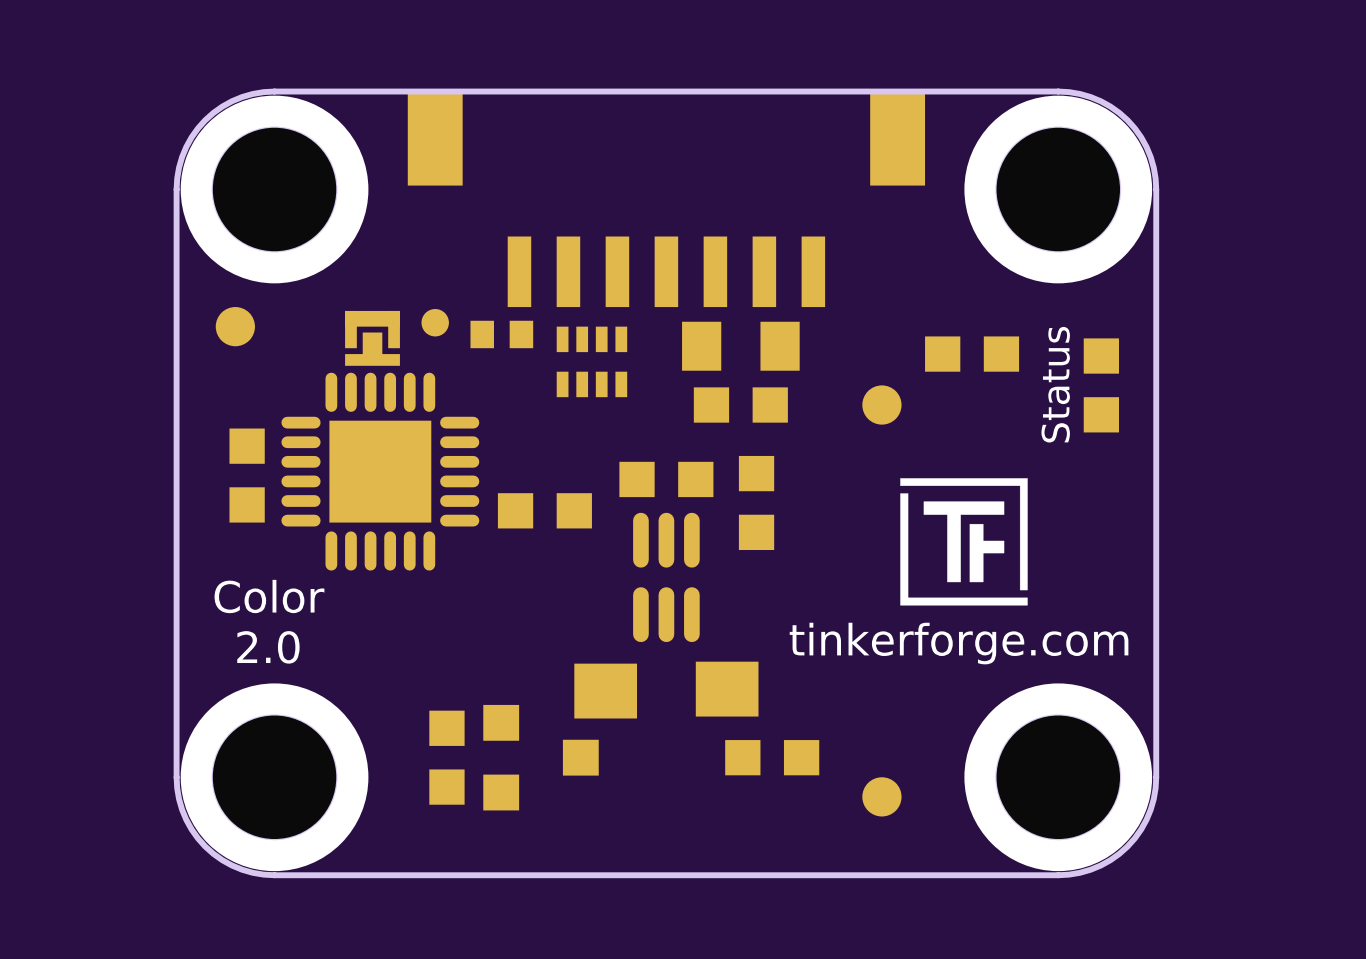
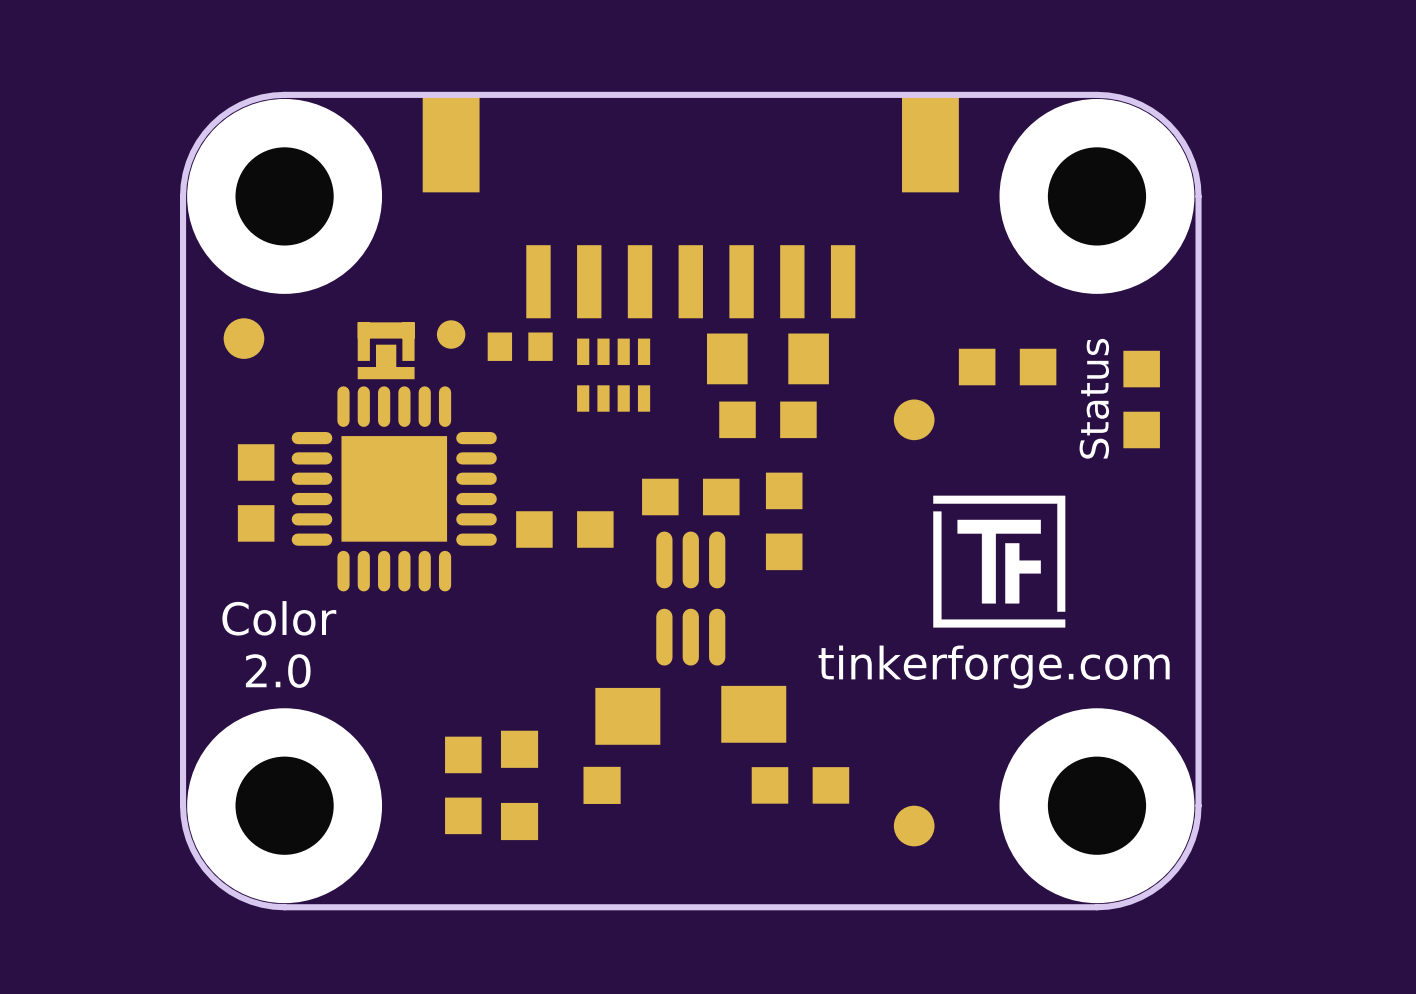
part footprint: [180, 95, 369, 284] -> [187, 98, 383, 294]
part footprint: [964, 95, 1153, 284] -> [999, 98, 1195, 294]
part footprint: [180, 683, 369, 872] -> [187, 708, 383, 904]
part footprint: [964, 683, 1153, 872] -> [999, 708, 1195, 904]

